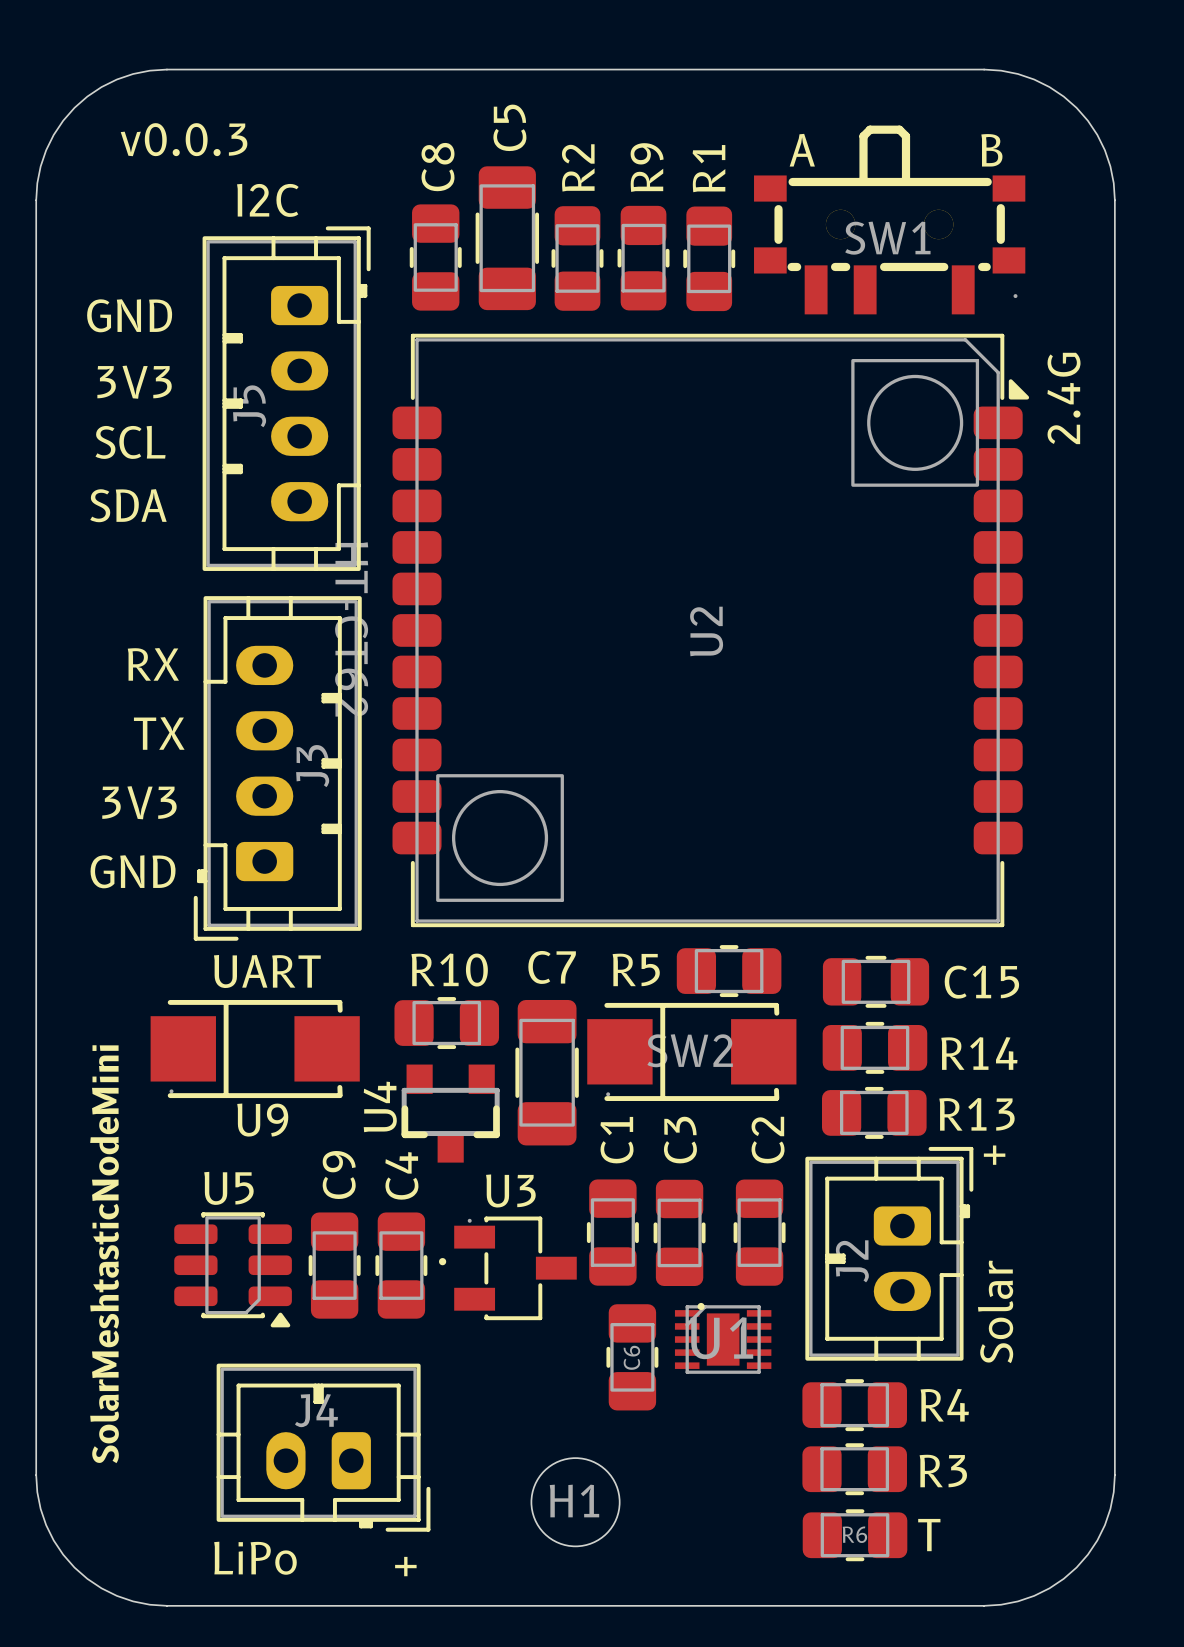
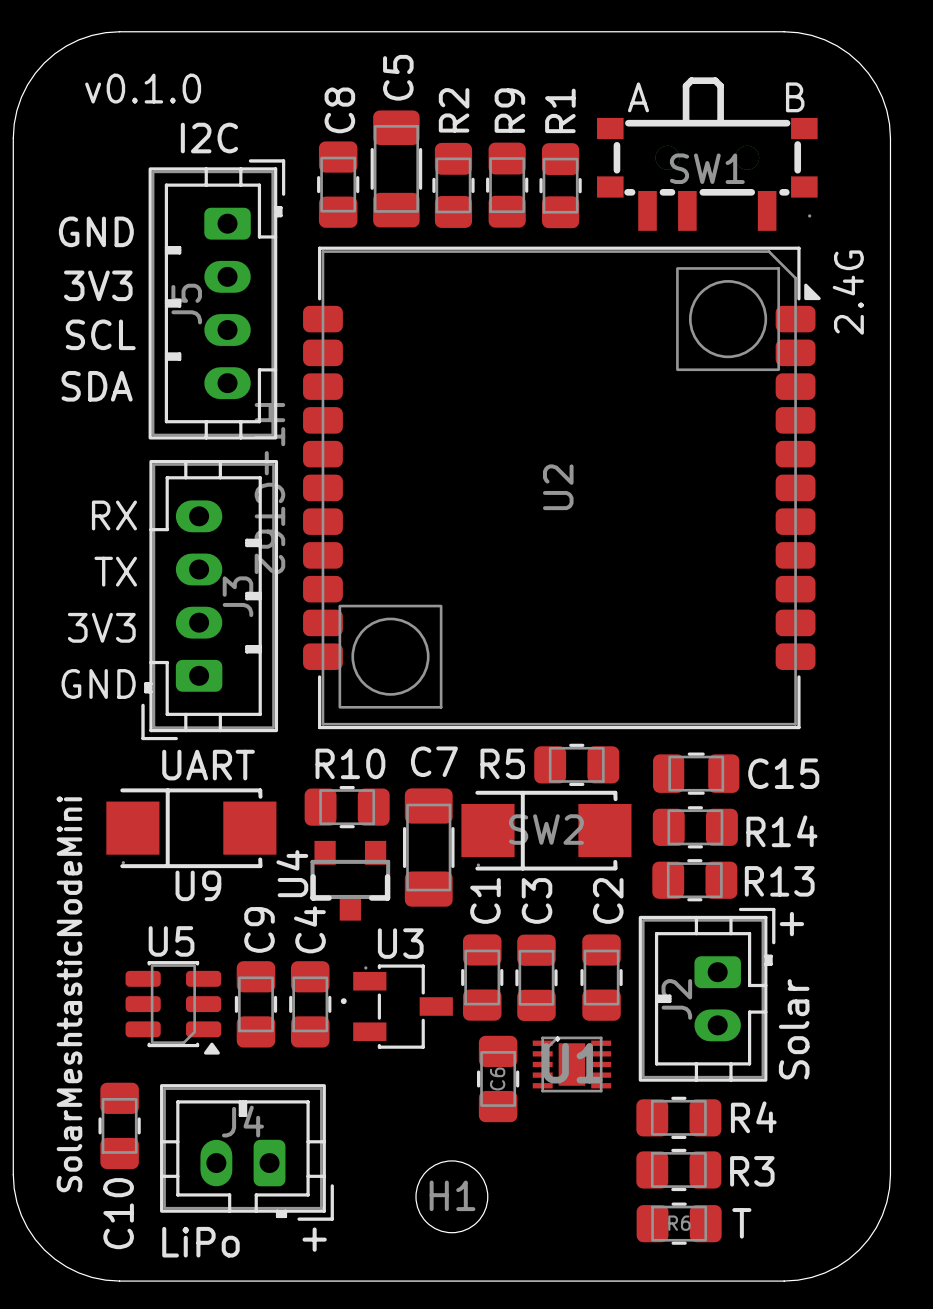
text: v0.0.3 (184, 139) -> v0.1.0 (143, 88)
C10: none -> (119, 1125)

